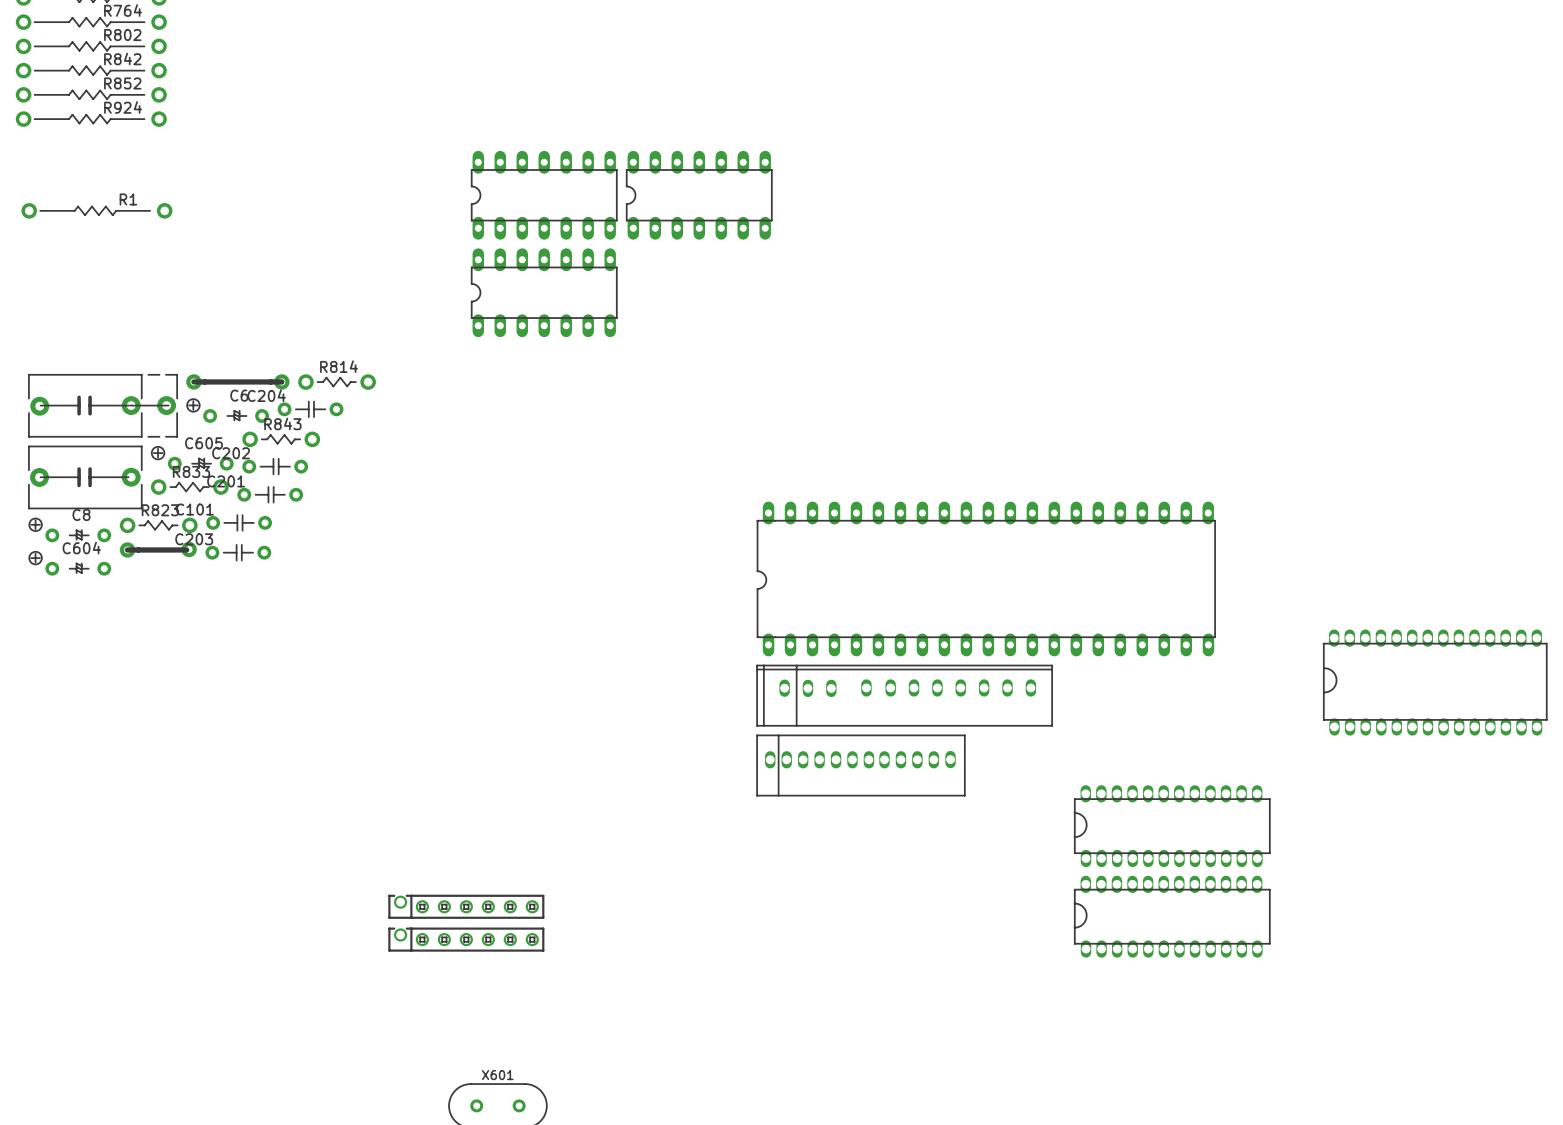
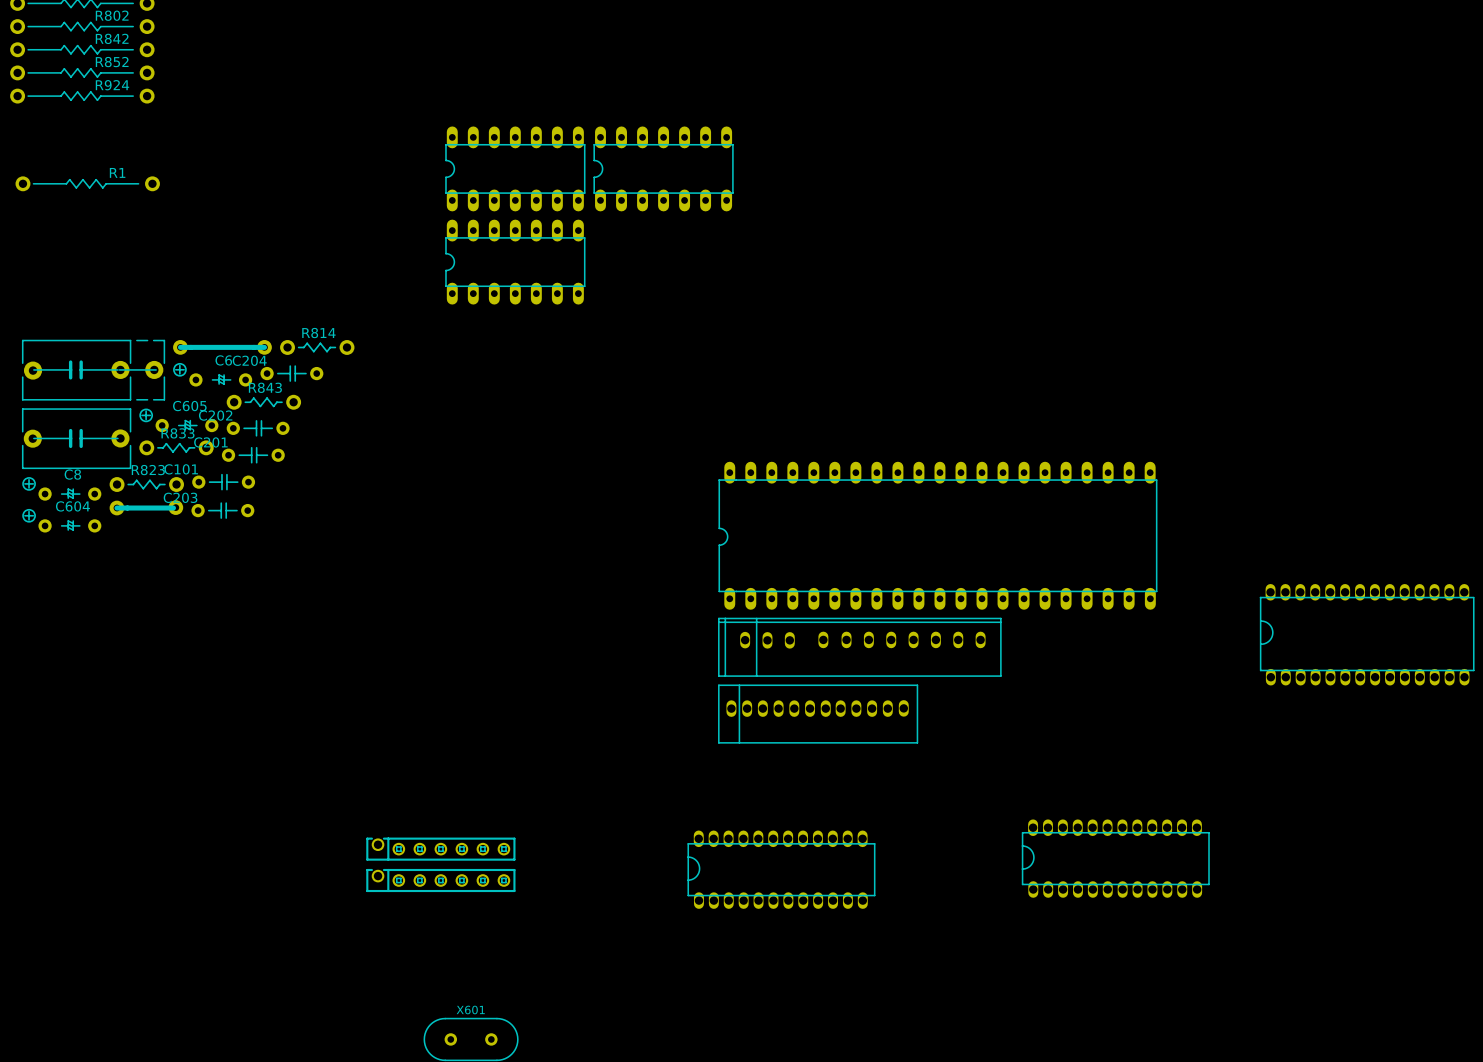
part: (1172, 826) -> none
part: none -> (781, 869)

